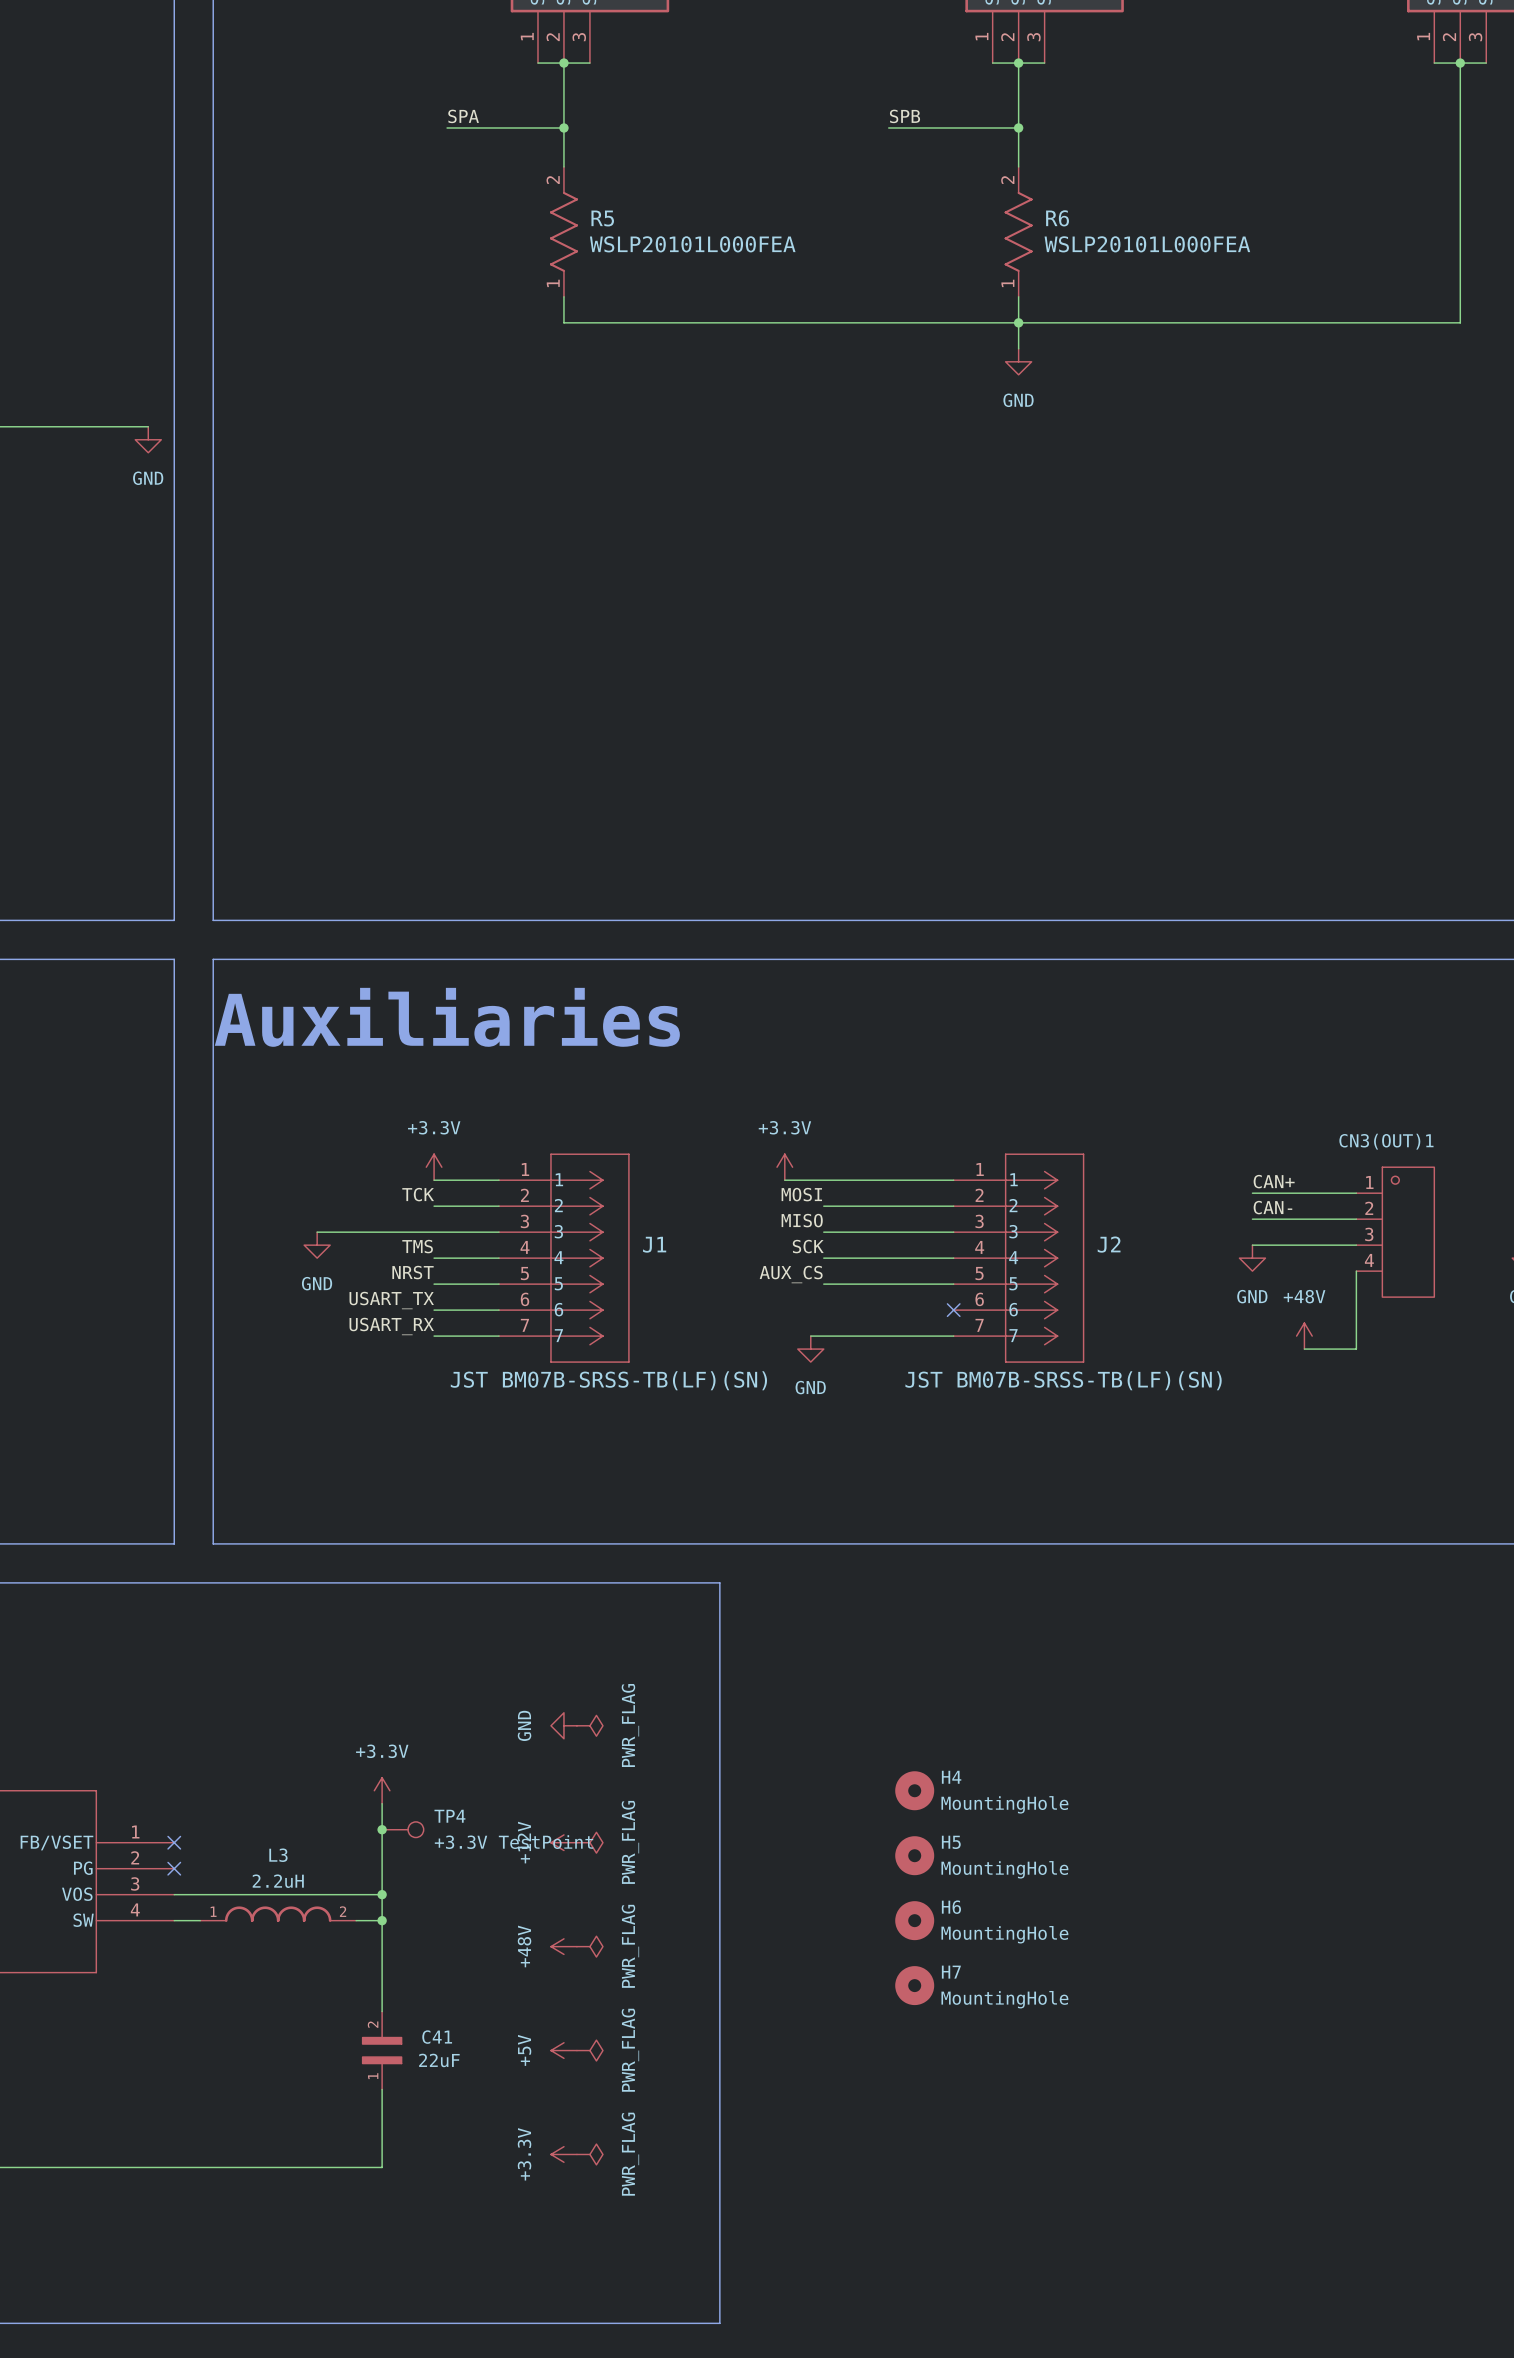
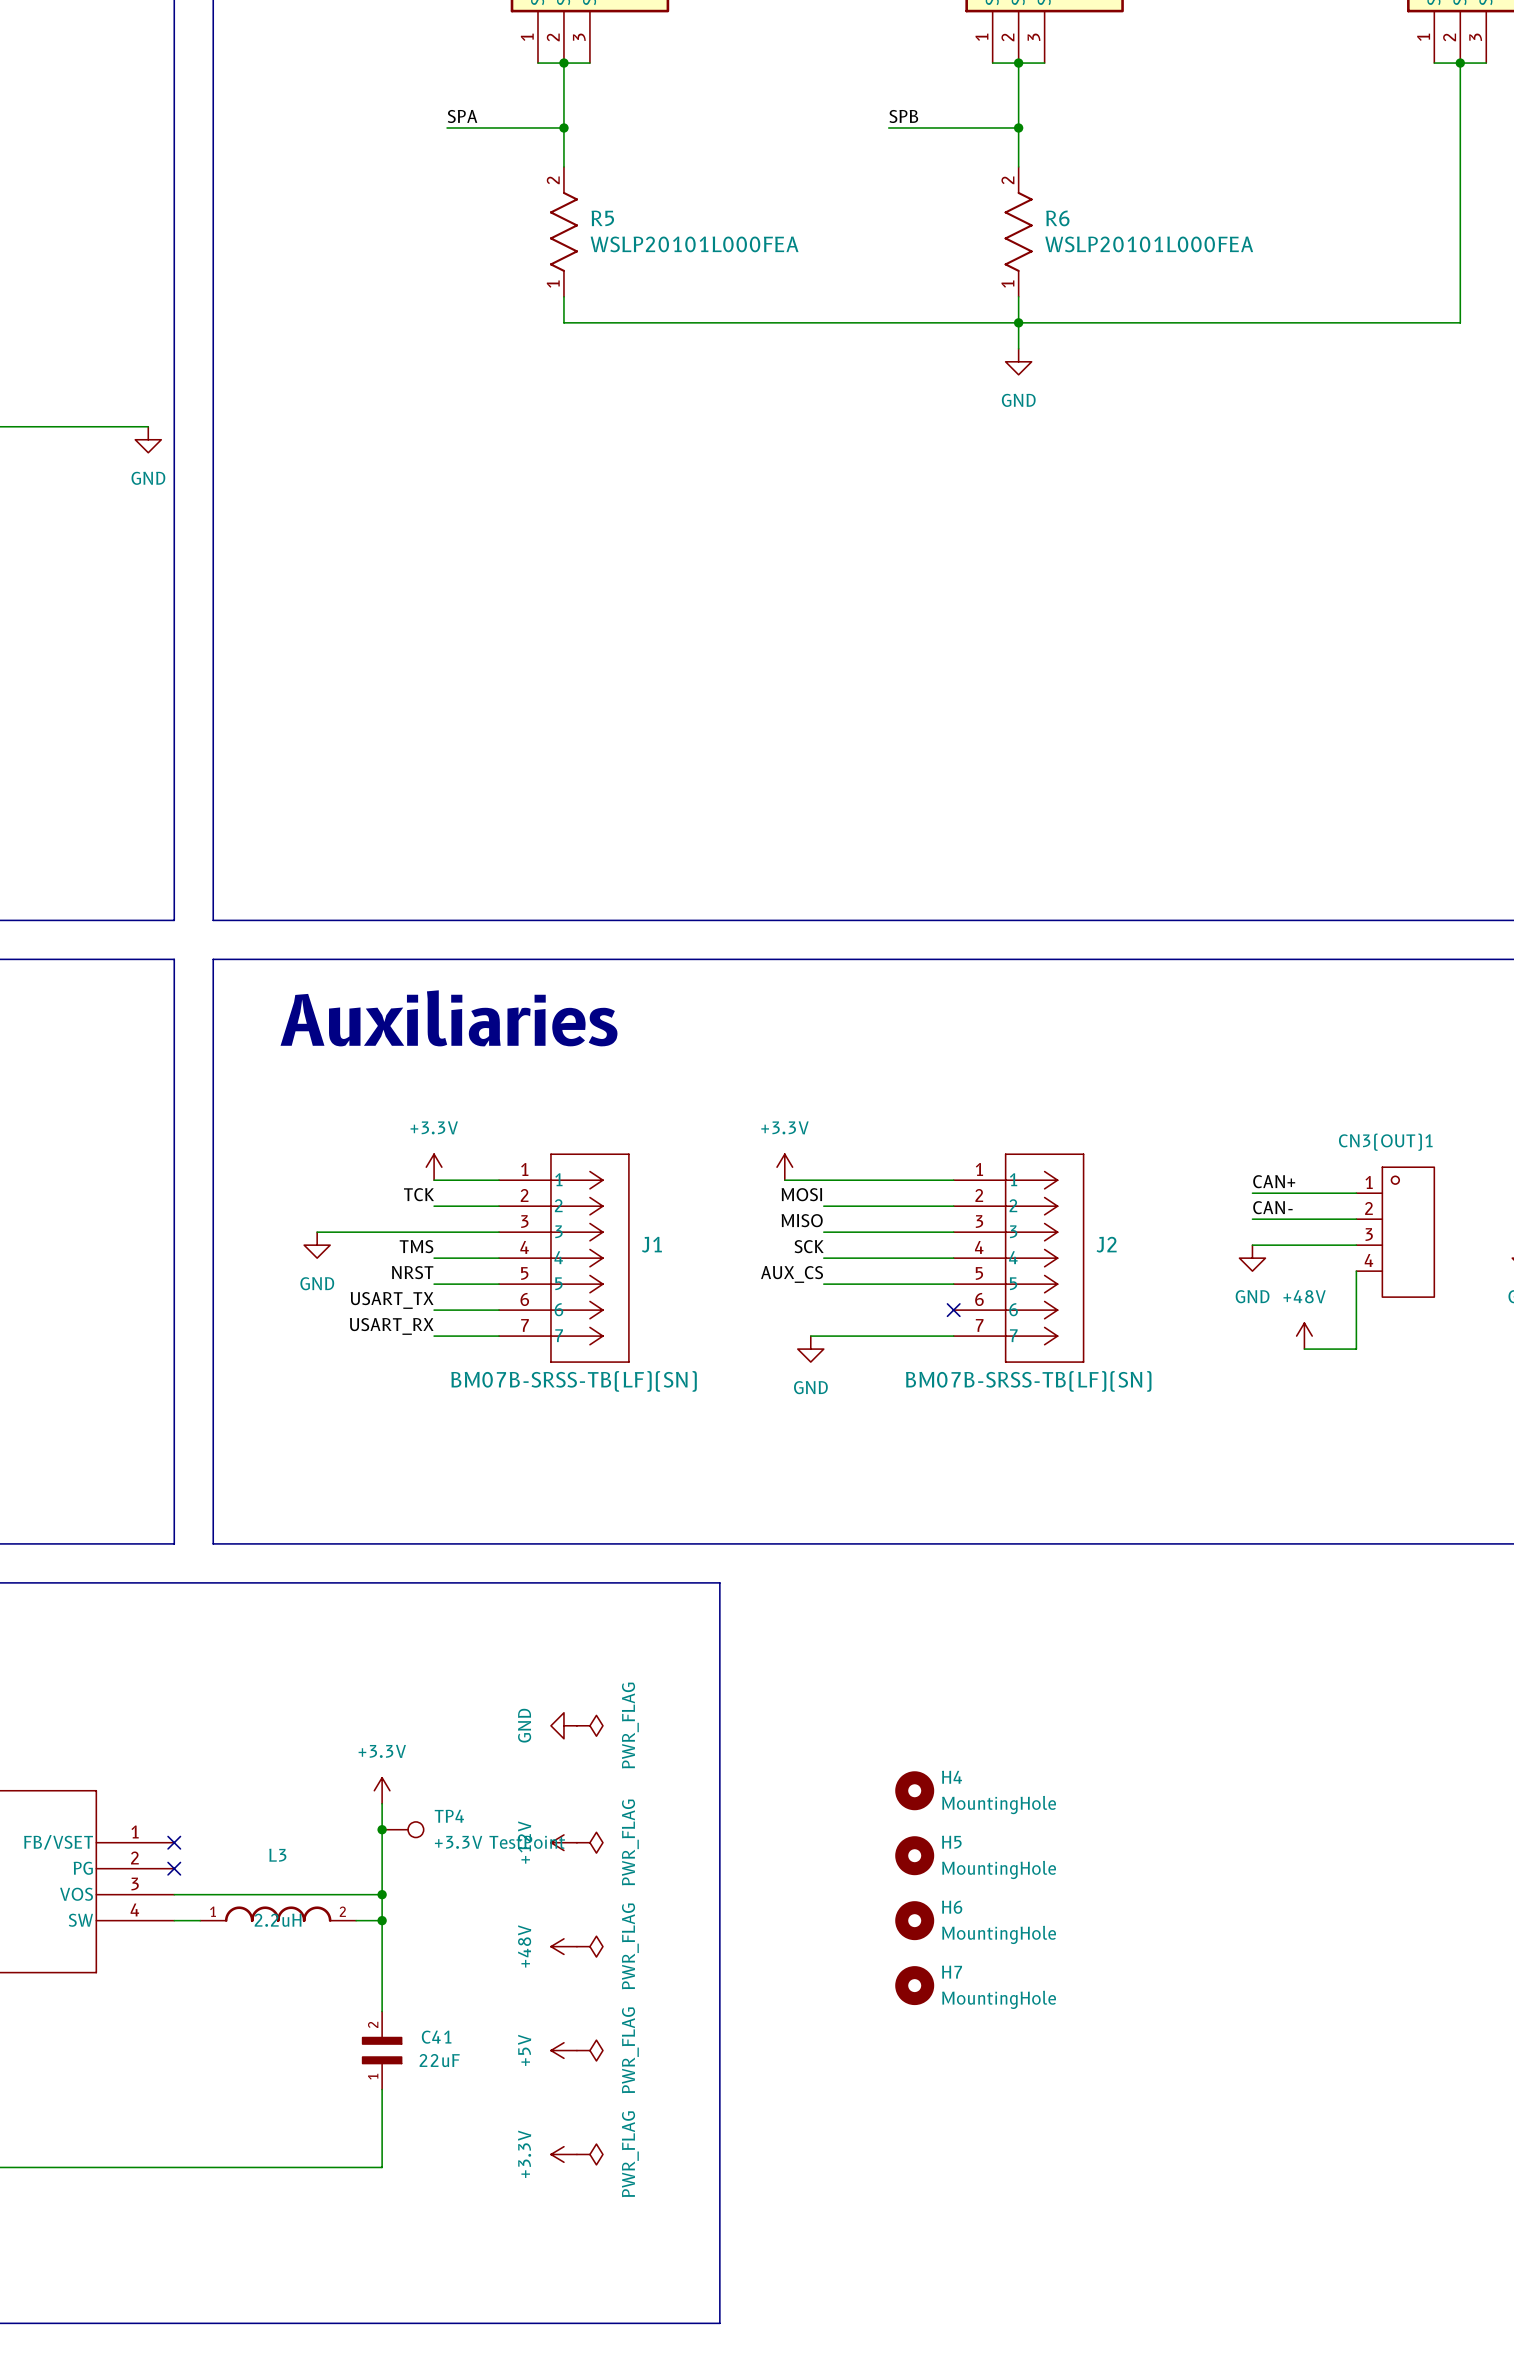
J1 value: JST BM07B-SRSS-TB(LF)(SN) (608, 1380) -> BM07B-SRSS-TB(LF)(SN) (574, 1381)
J2 value: JST BM07B-SRSS-TB(LF)(SN) (1063, 1380) -> BM07B-SRSS-TB(LF)(SN) (1028, 1381)
L3 value: 2.2uH (278, 1881) -> none
L3 text: none -> 2.2uH (278, 1920)

